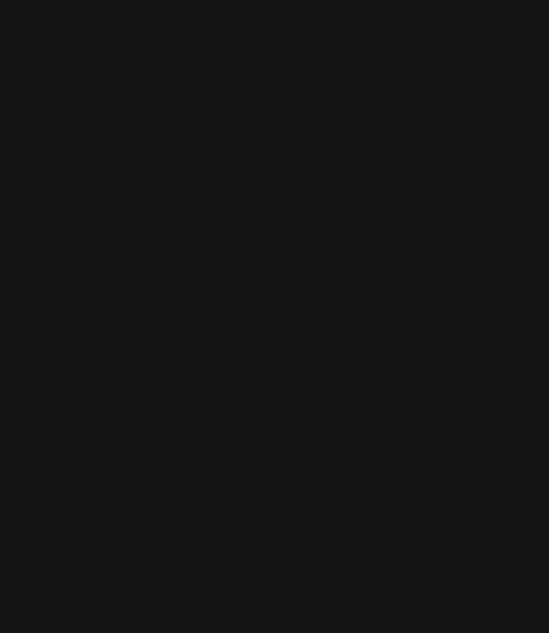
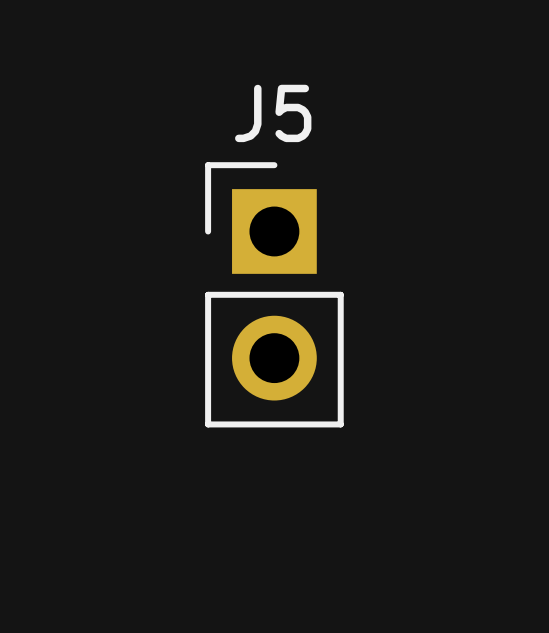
J5: none -> (274, 294)

